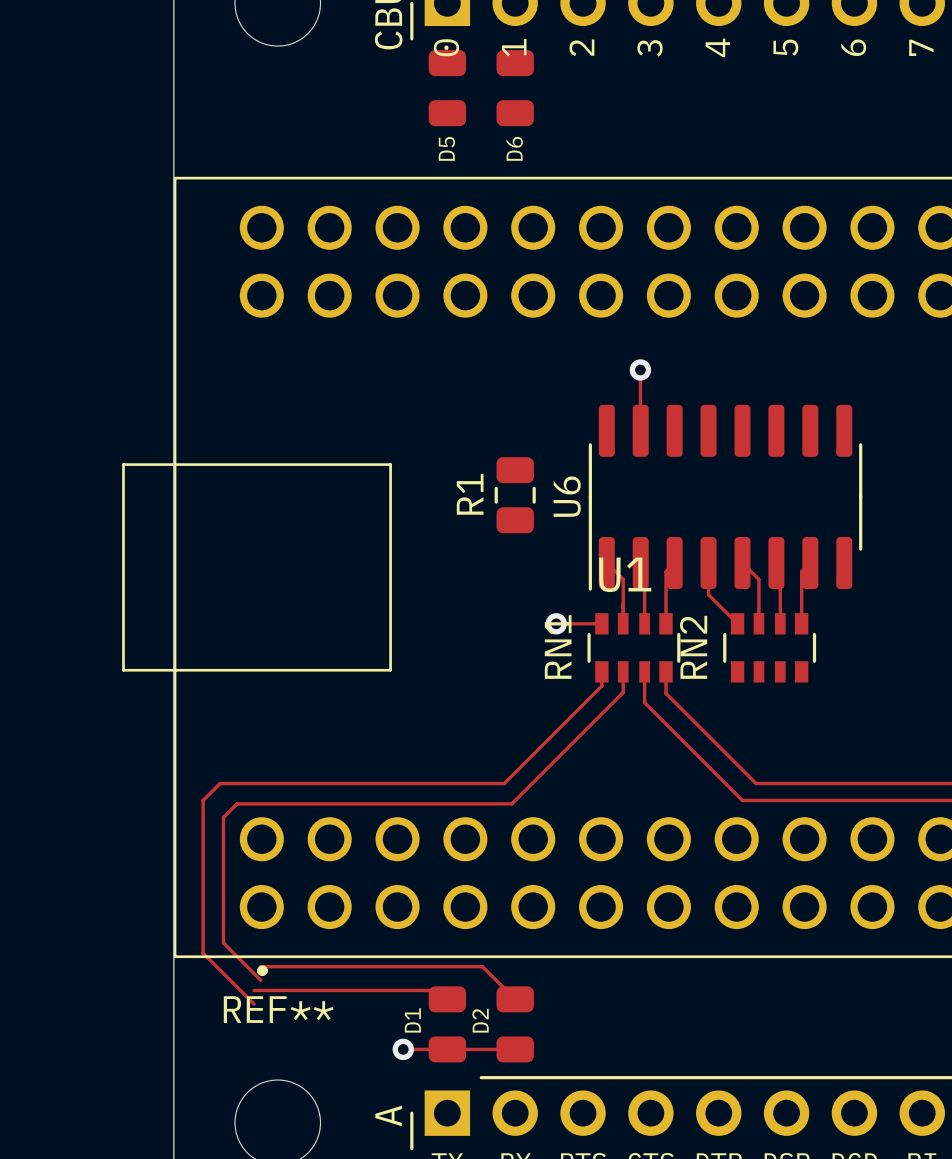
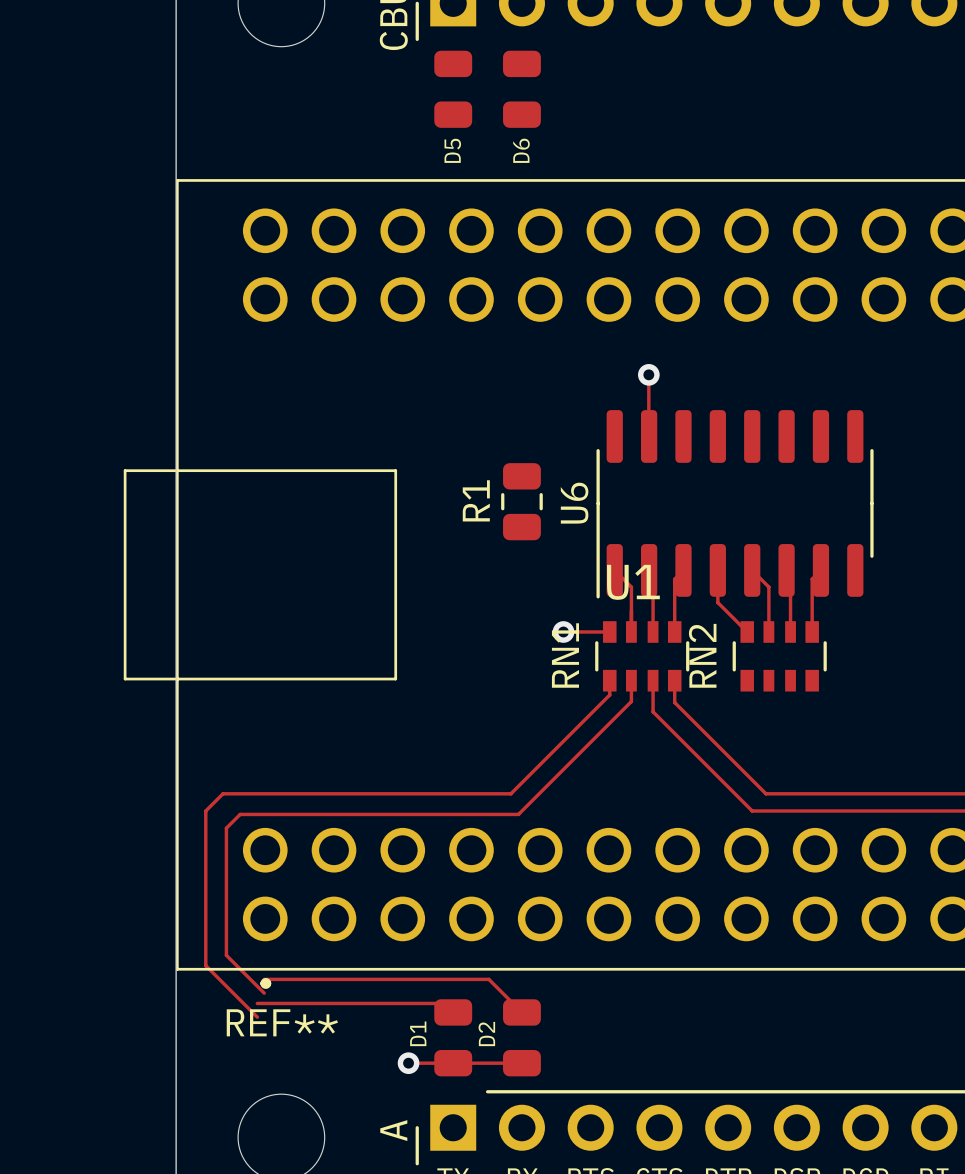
text: 0 (446, 47) -> none
text: 1 (514, 47) -> none
text: 2 (581, 47) -> none
text: 4 (717, 47) -> none
text: 5 (785, 47) -> none
text: 6 (853, 47) -> none
text: 7 (921, 47) -> none
text: 3 (649, 48) -> none

